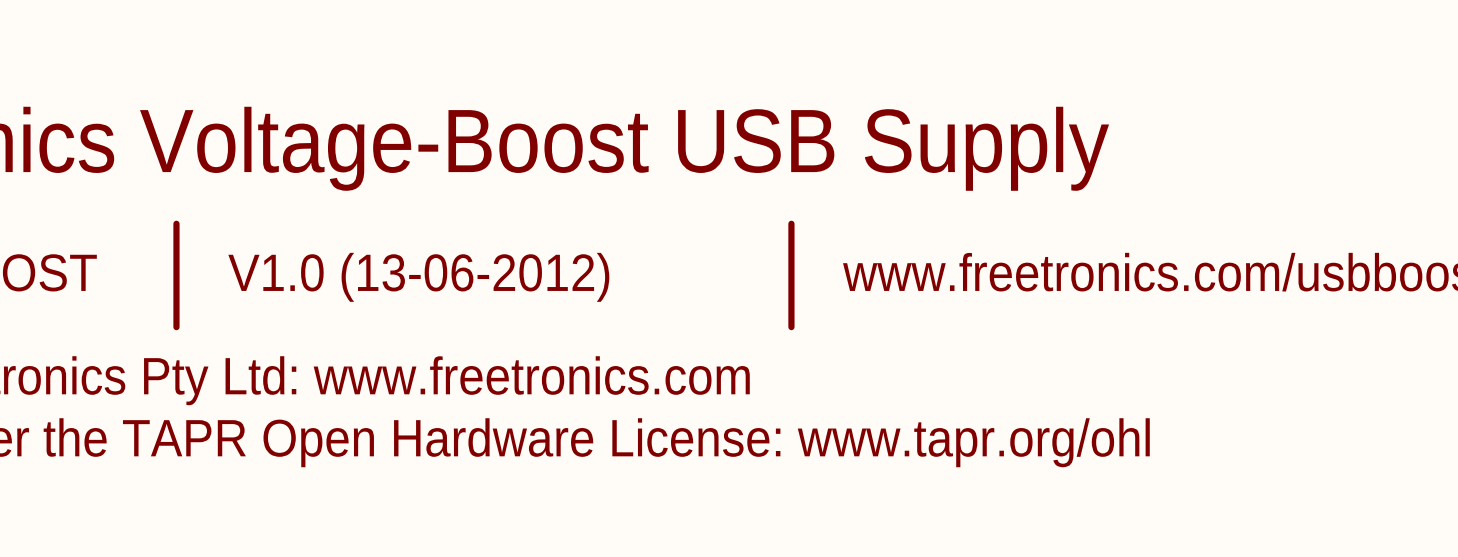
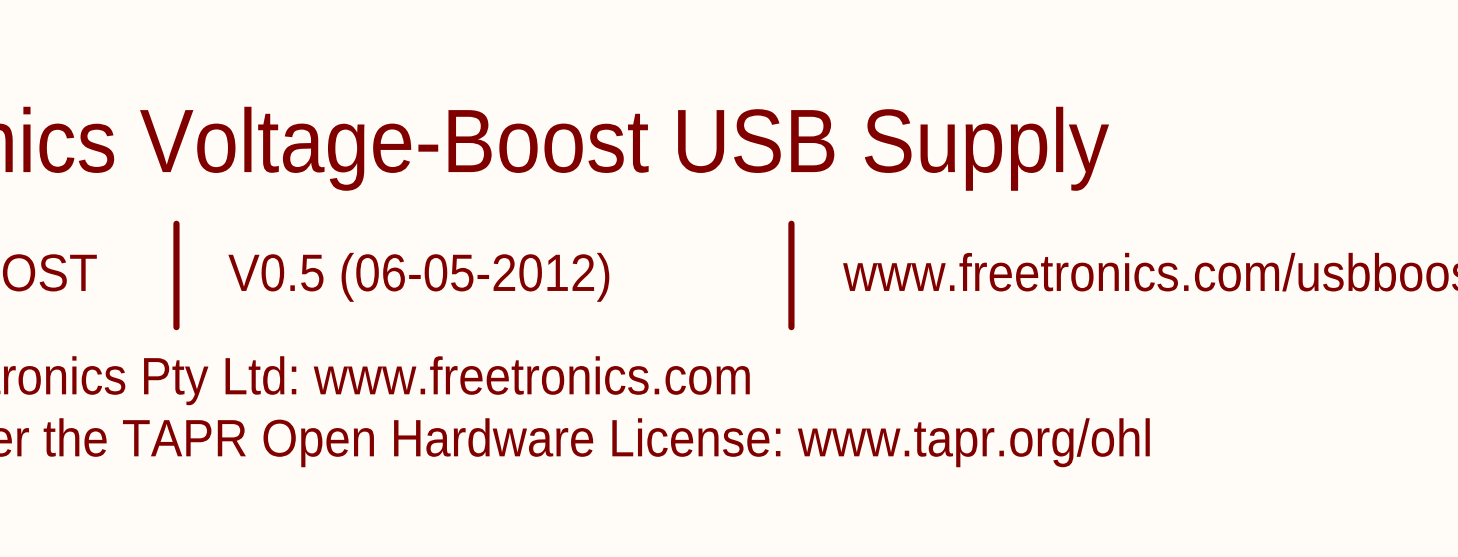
text: V1.0 (13-06-2012) (418, 277) -> V0.5 (06-05-2012) (418, 277)

